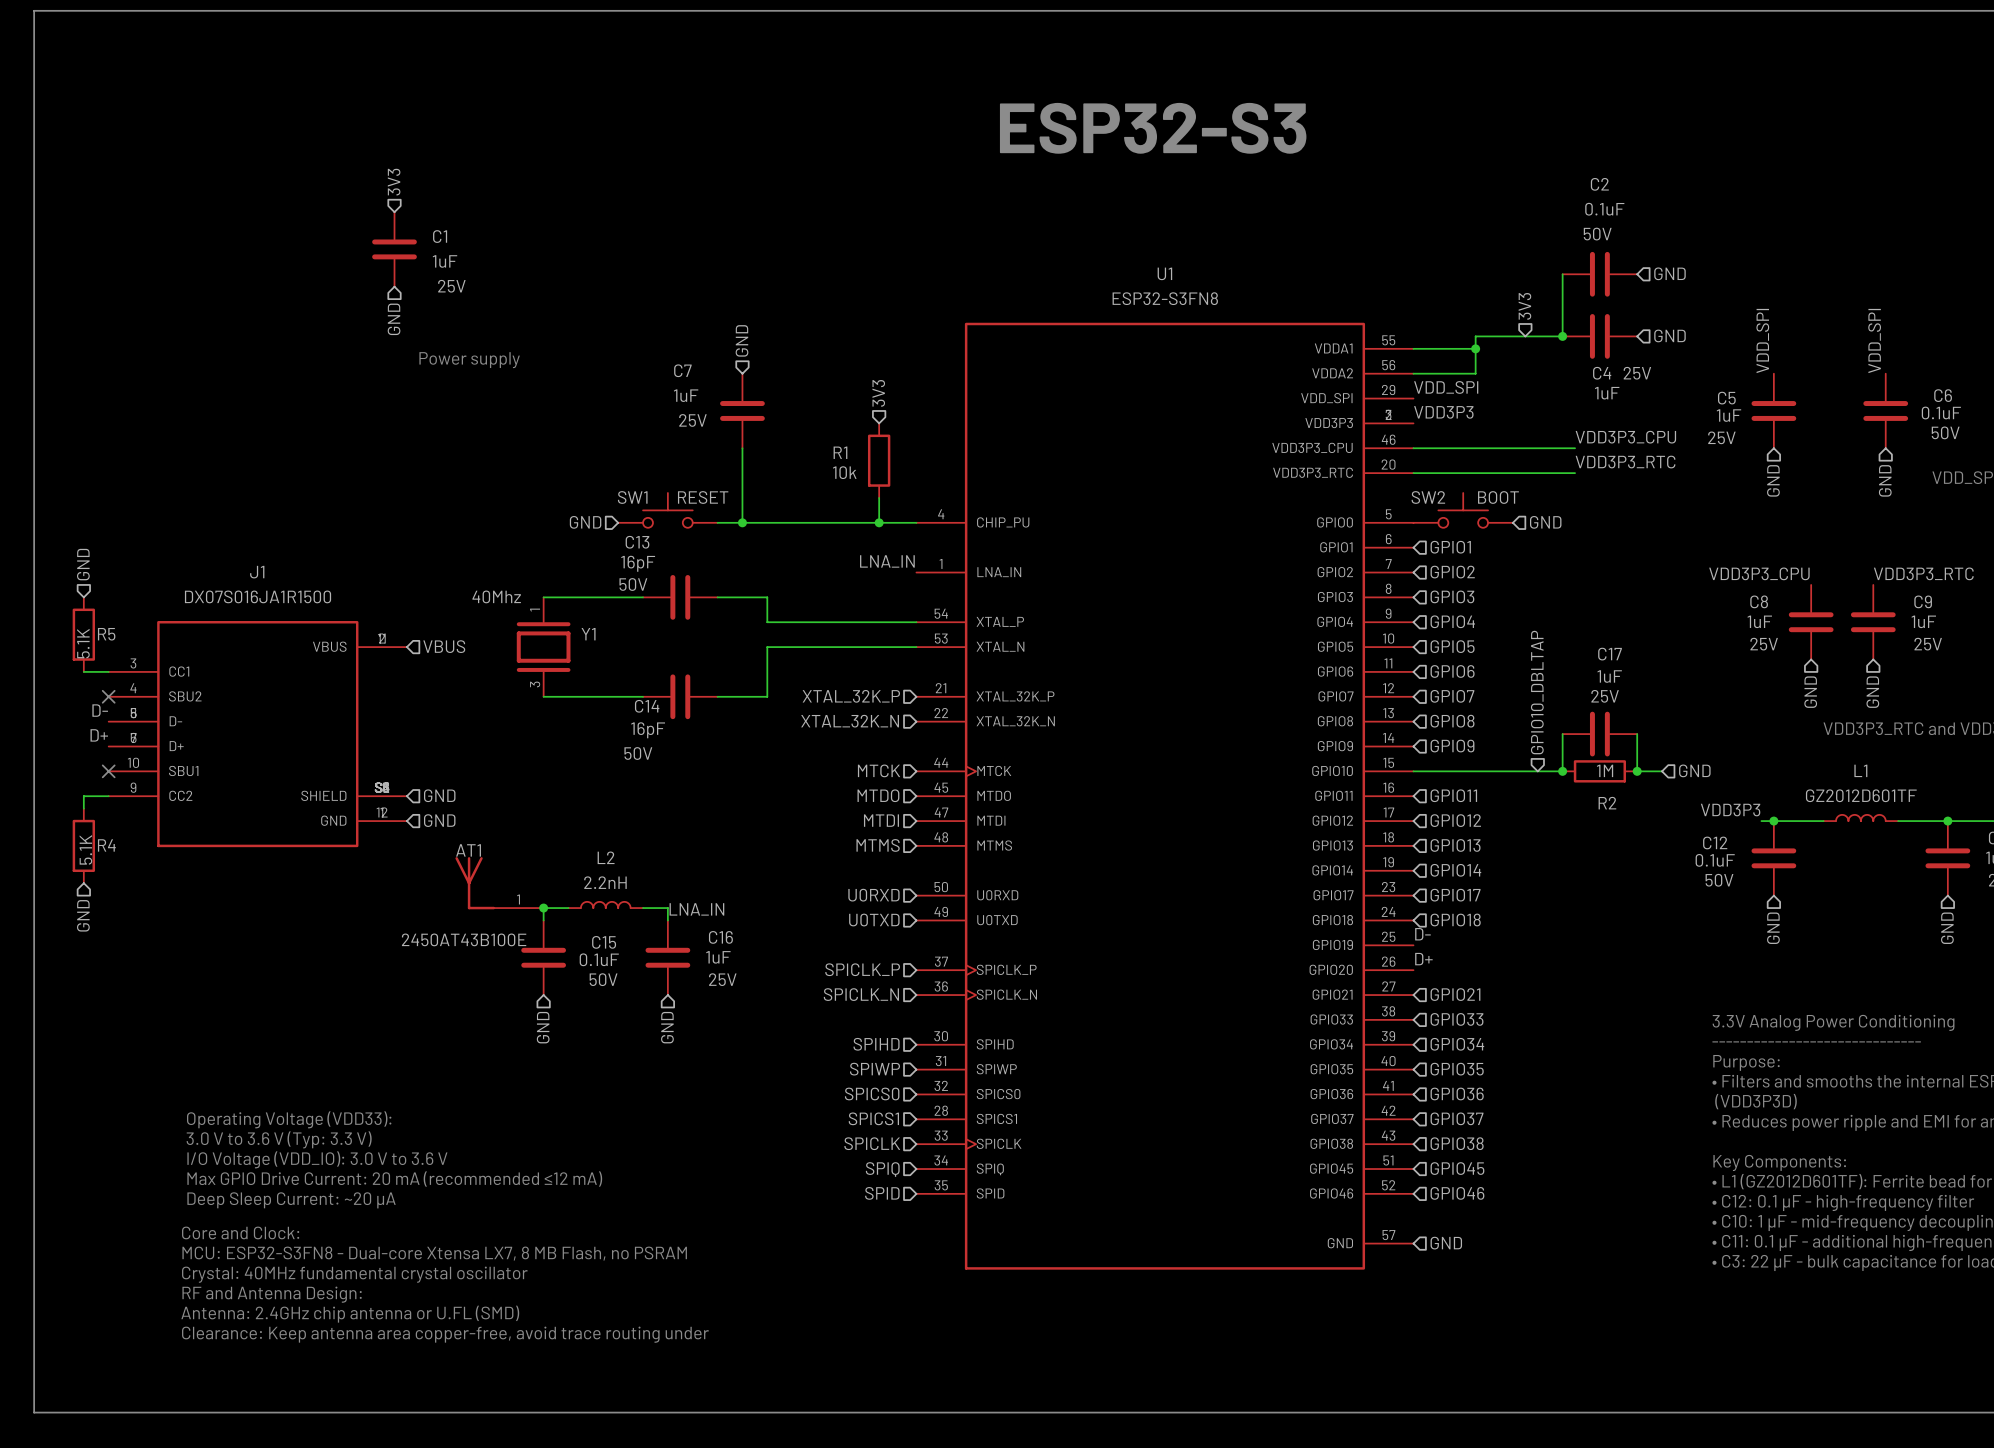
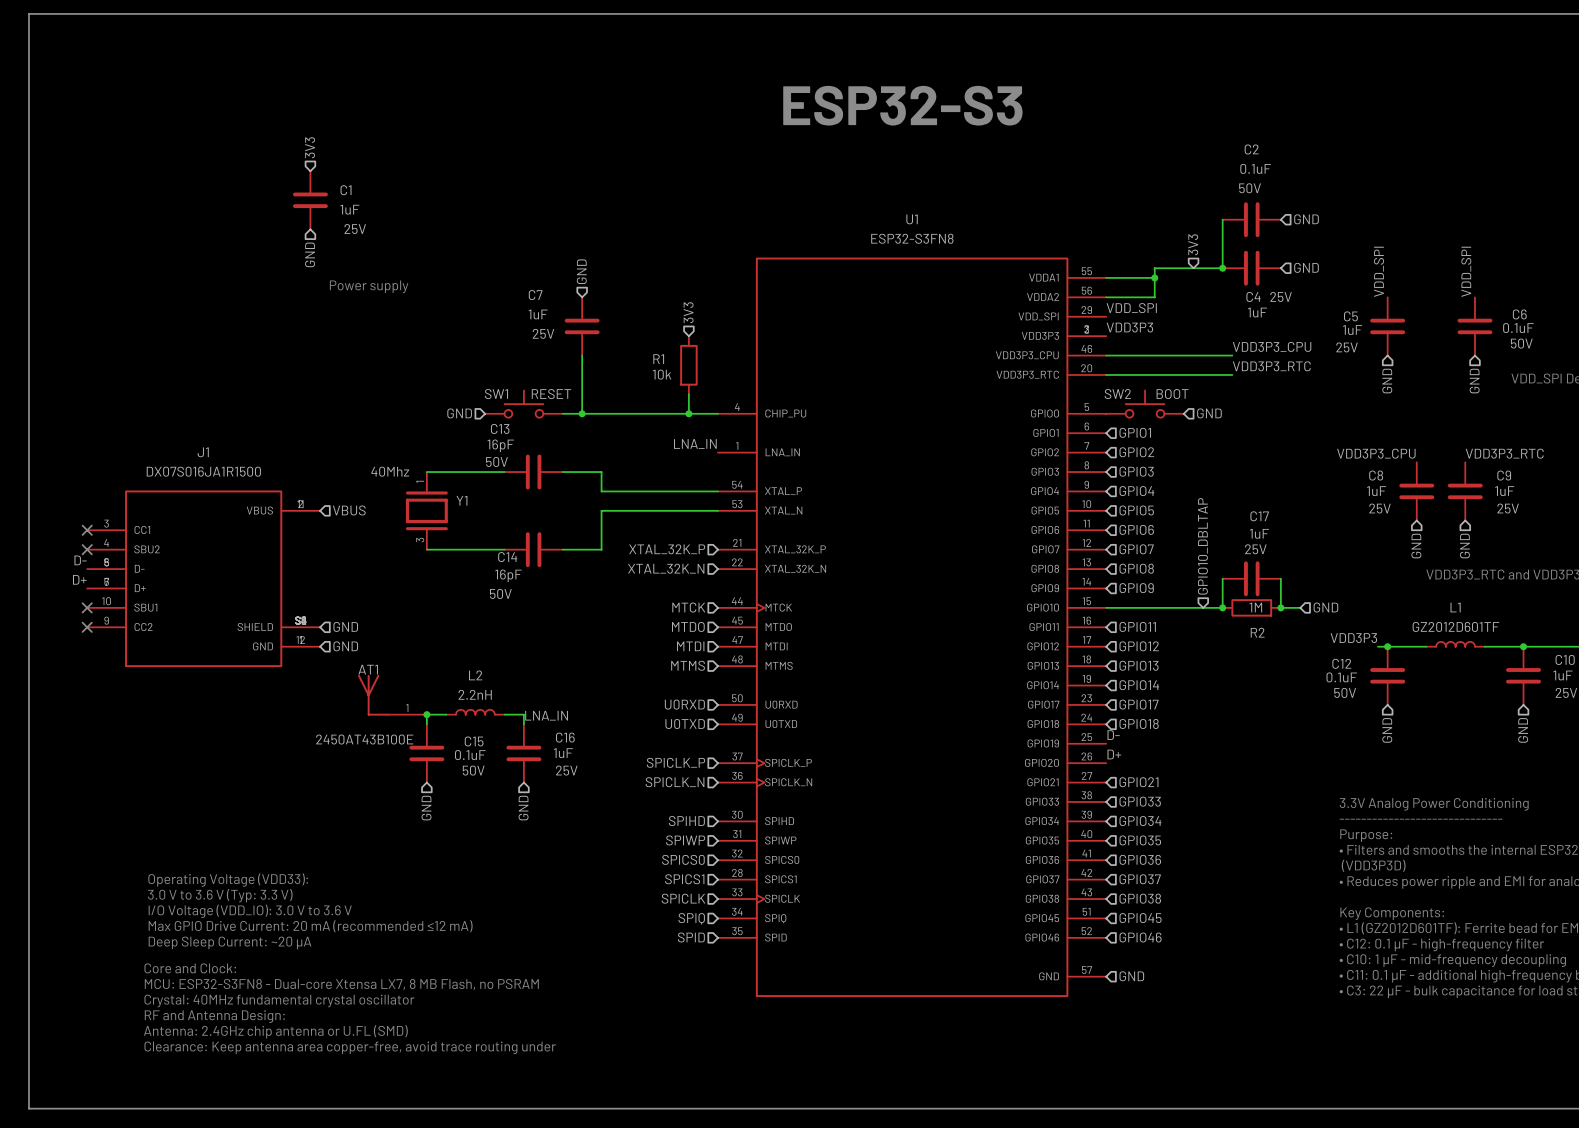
hierarchical label: GND (83, 564) -> none
R5: 5.1K (83, 634) -> none
wire: (83, 671) (108, 671) -> none
no-connect mark: none -> (87, 530)
wire: (108, 796) (83, 796) (83, 808) -> none
no-connect mark: none -> (87, 627)
R4: 5.1K (83, 845) -> none
hierarchical label: GND (83, 915) -> none

